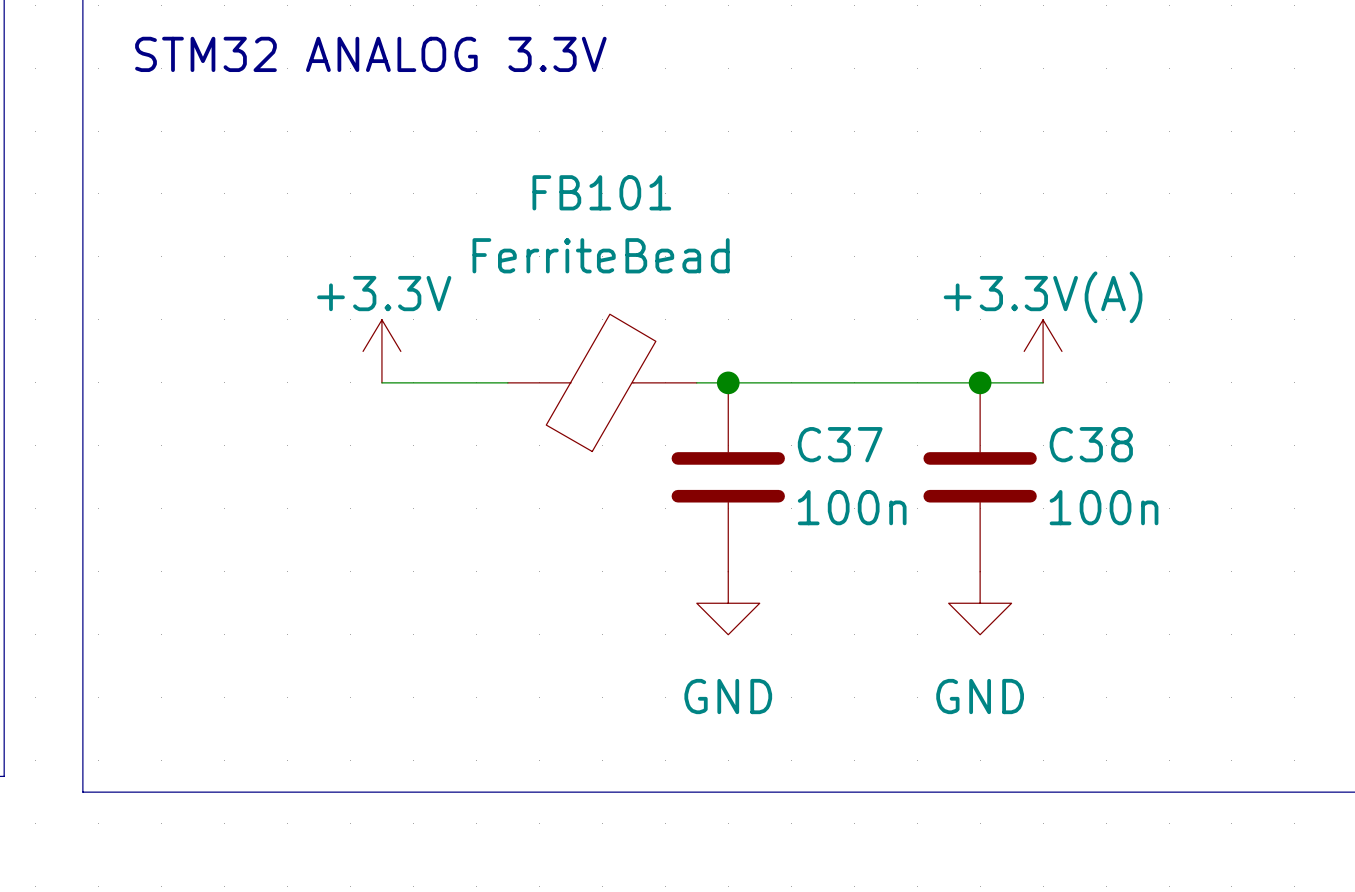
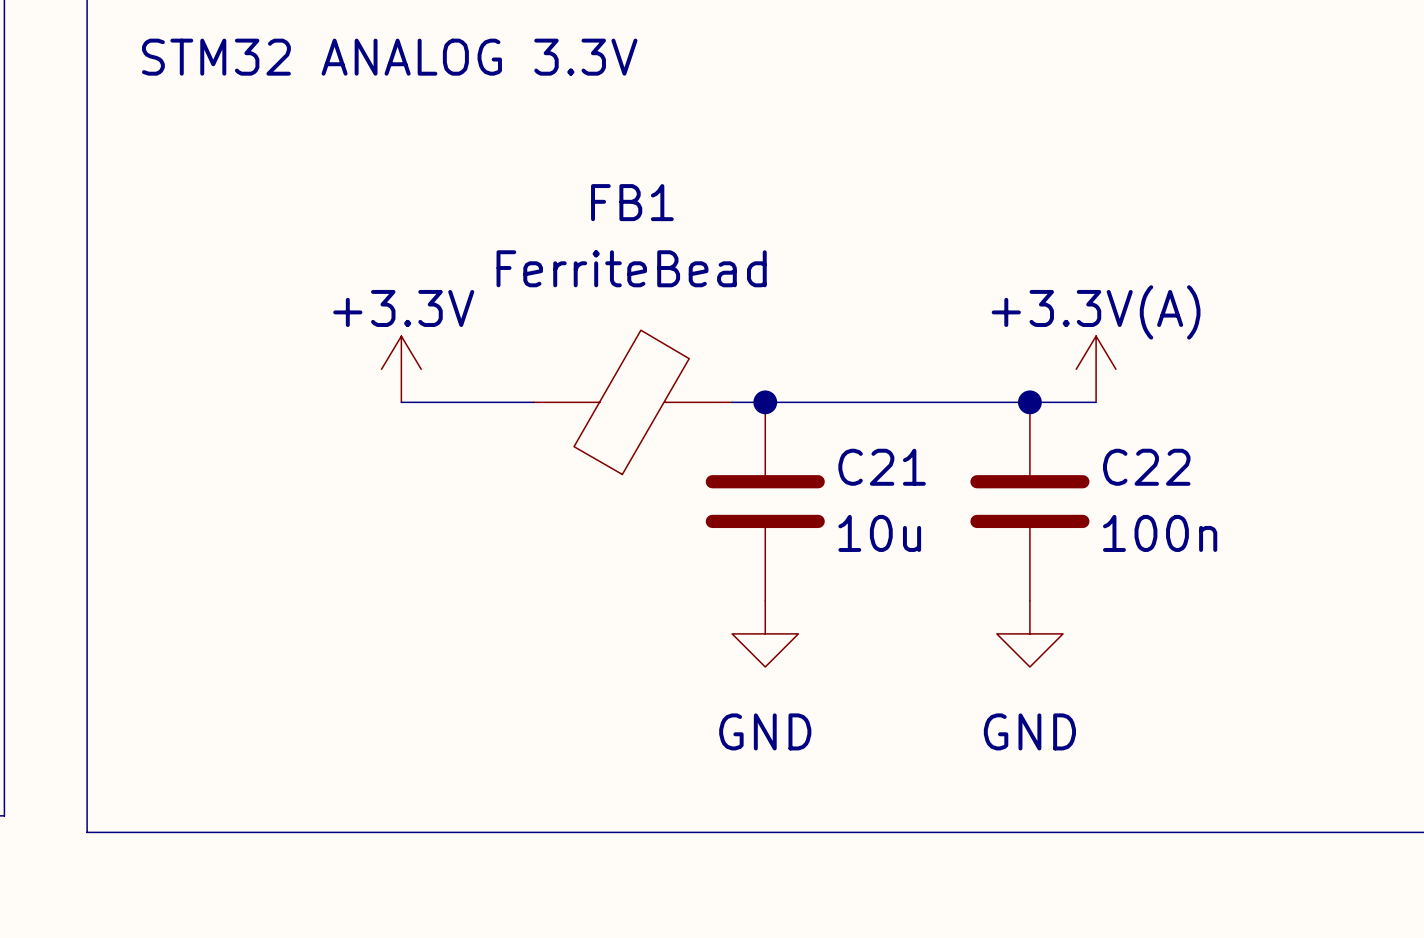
FB101 name: FB101 (601, 192) -> FB1 (632, 202)
C37 name: C37 (840, 444) -> C21 (882, 467)
C38 name: C38 (1091, 444) -> C22 (1146, 467)
C37 value: 100n (852, 507) -> 10u (879, 533)

